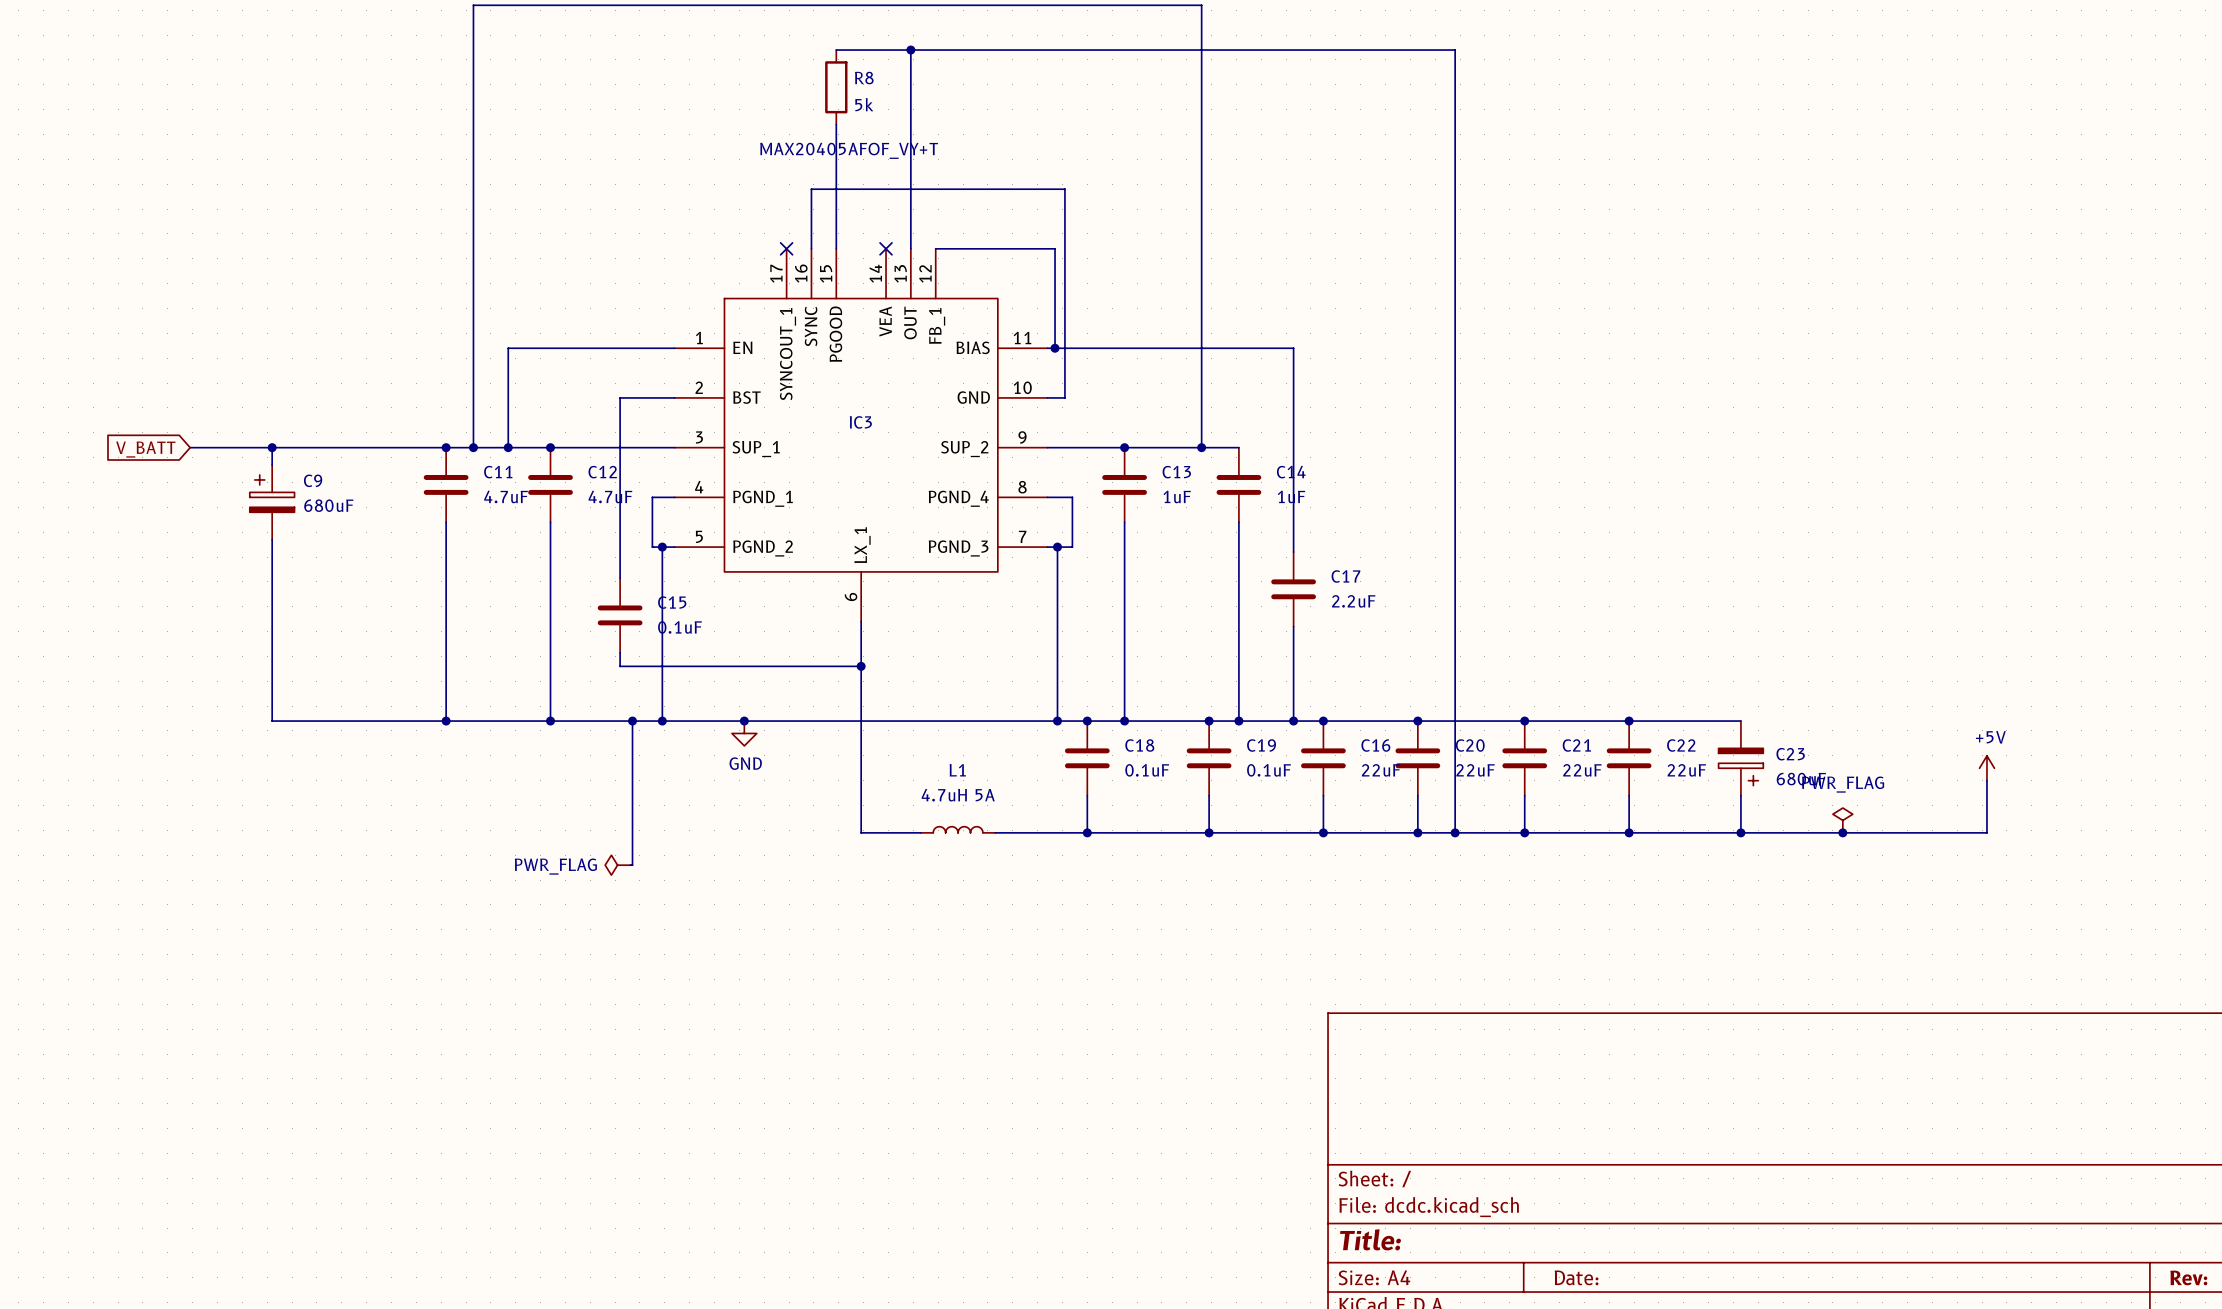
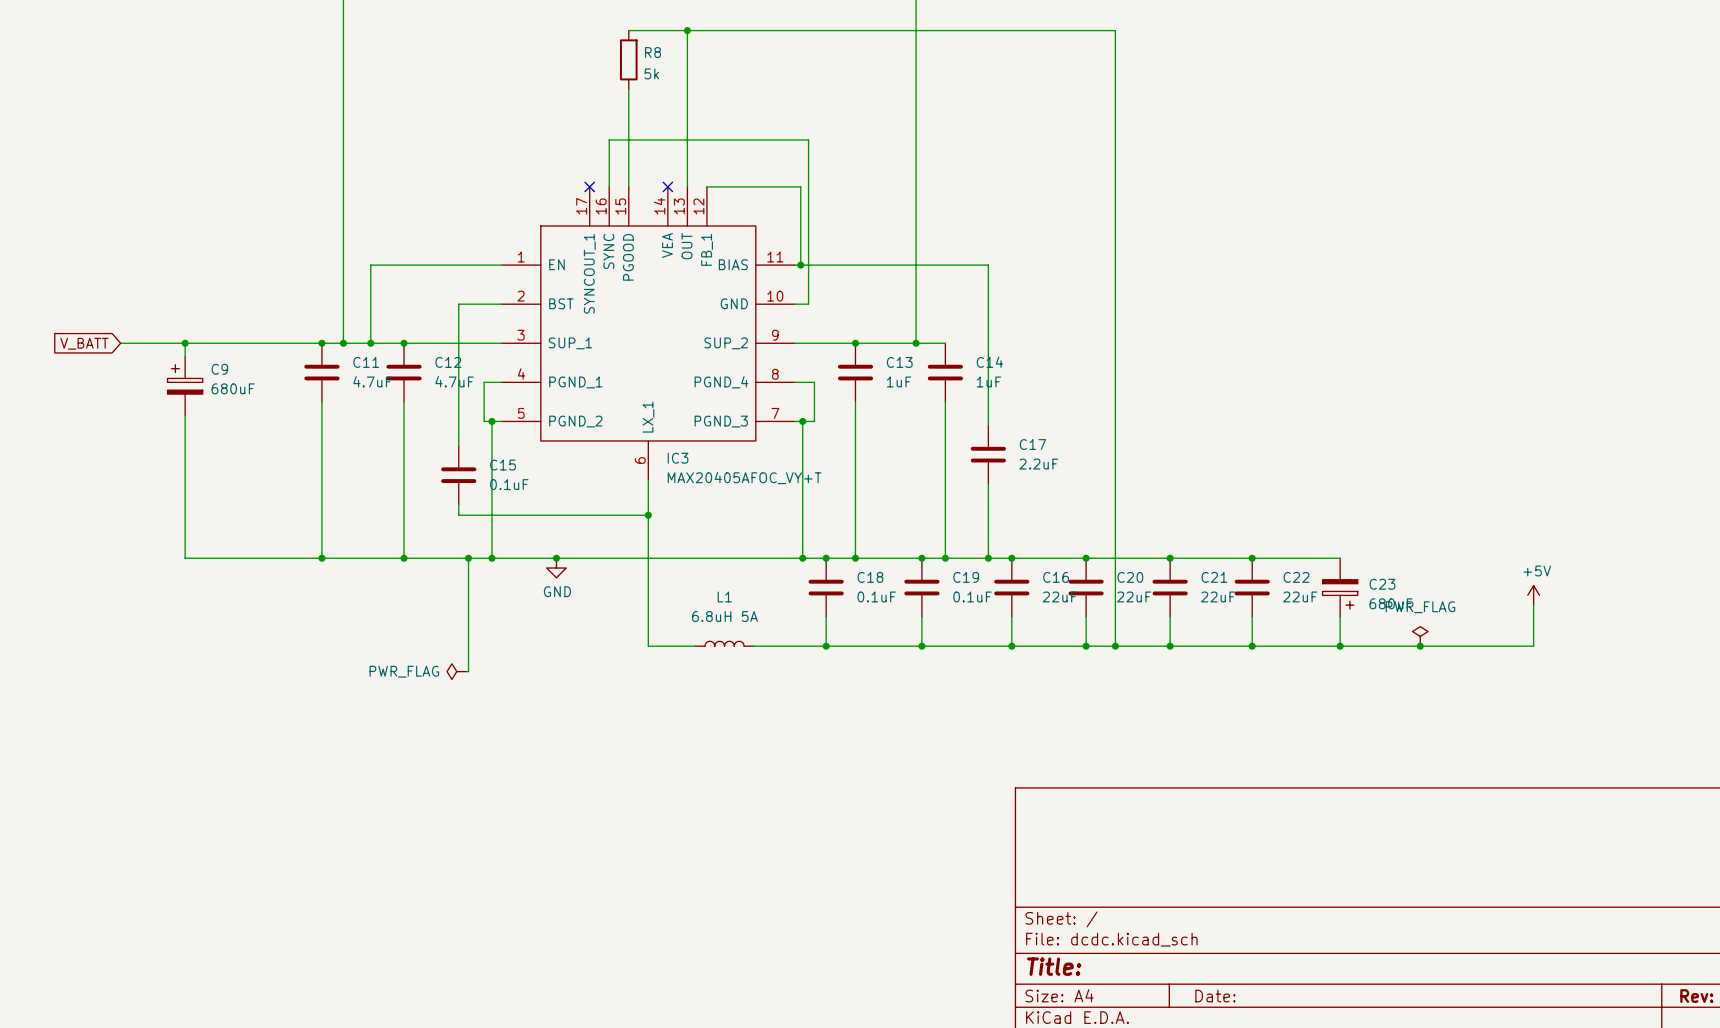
IC3 value: MAX20405AFOF_VY+T (849, 150) -> MAX20405AFOC_VY+T (744, 477)
IC3 name position: IC3 (860, 422) -> IC3 (678, 458)
L1 value: 4.7uH 5A (958, 795) -> 6.8uH 5A (725, 616)

